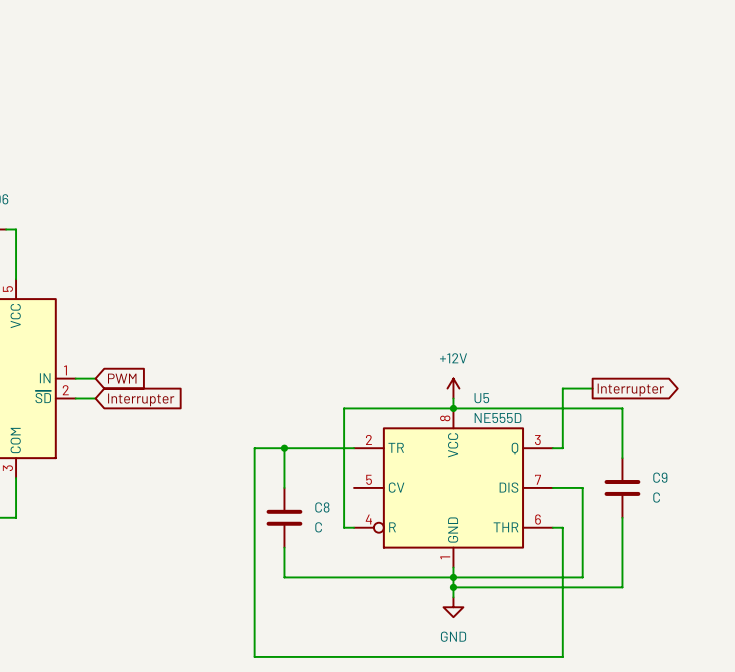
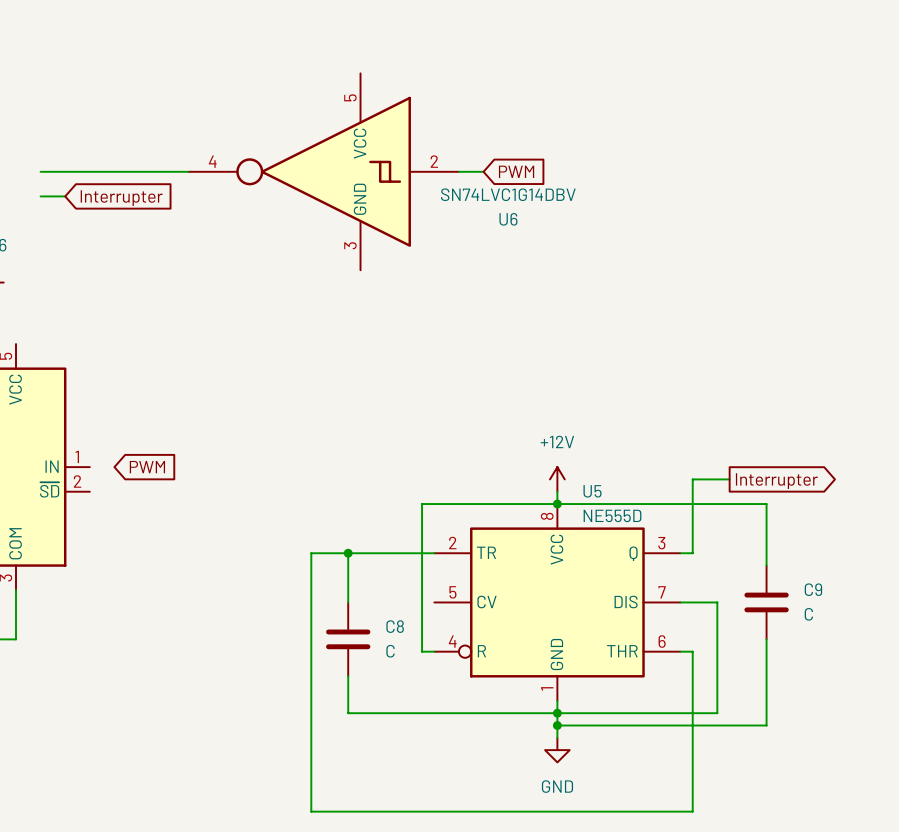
wire: none -> (40, 171) (188, 171)
U6: none -> SN74LVC1G14DBV (323, 171)
wire: none -> (458, 171) (483, 171)
global label: none -> PWM (516, 171)
wire: none -> (40, 196) (65, 196)
global label: none -> Interrupter (121, 198)
wire: (6, 229) (16, 229) (16, 279) -> none
wire: (75, 378) (95, 378) -> none
wire: (75, 398) (95, 398) -> none
global label: Interrupter (141, 399) -> none

